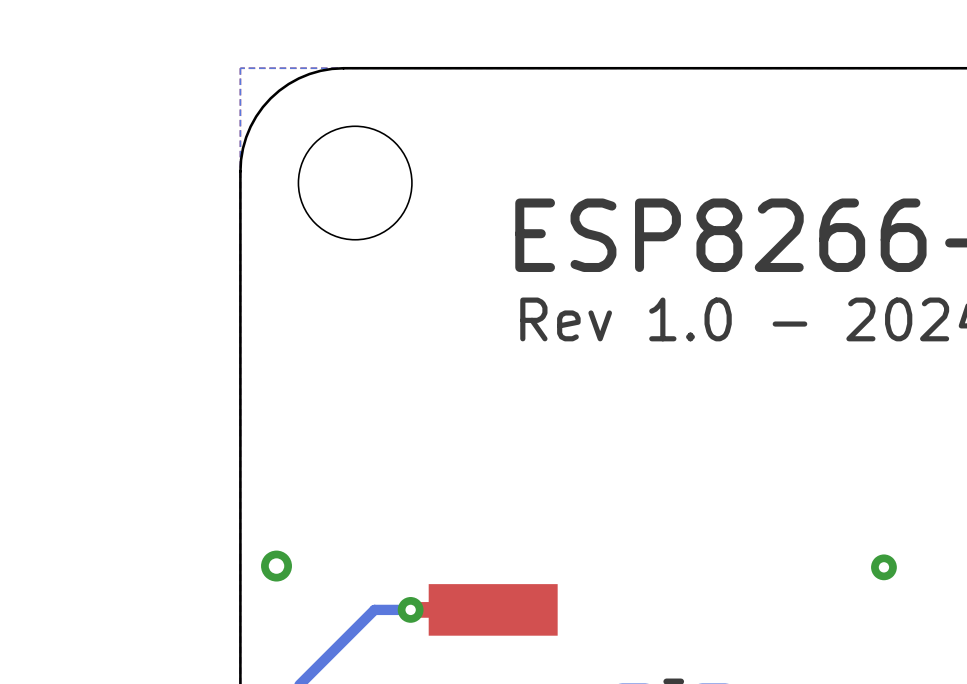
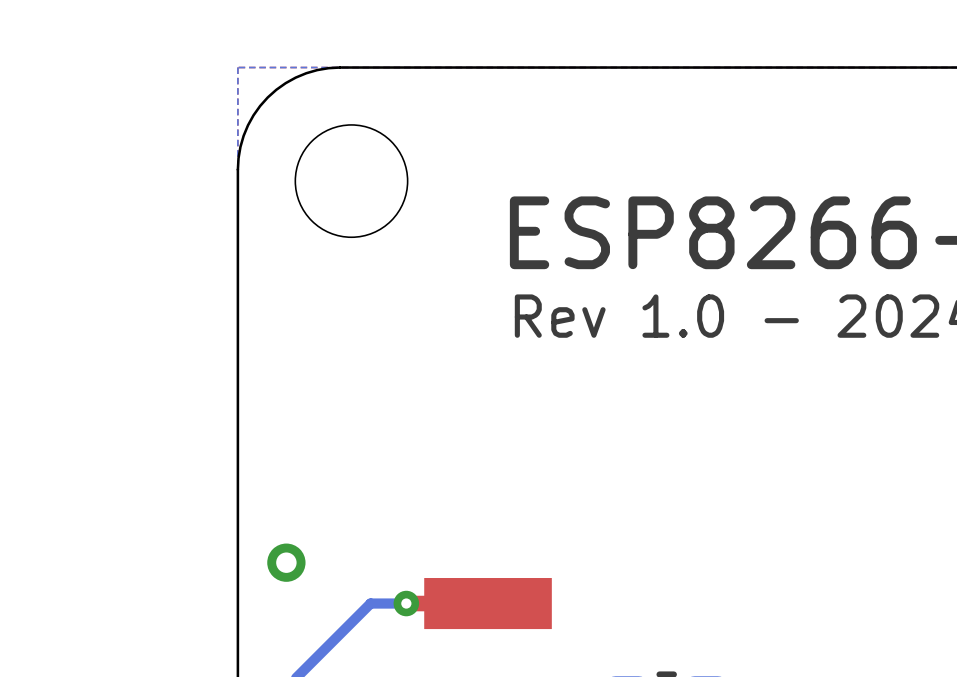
via size: [261, 550, 292, 582] -> [267, 543, 306, 582]
via: (883, 567) -> none

